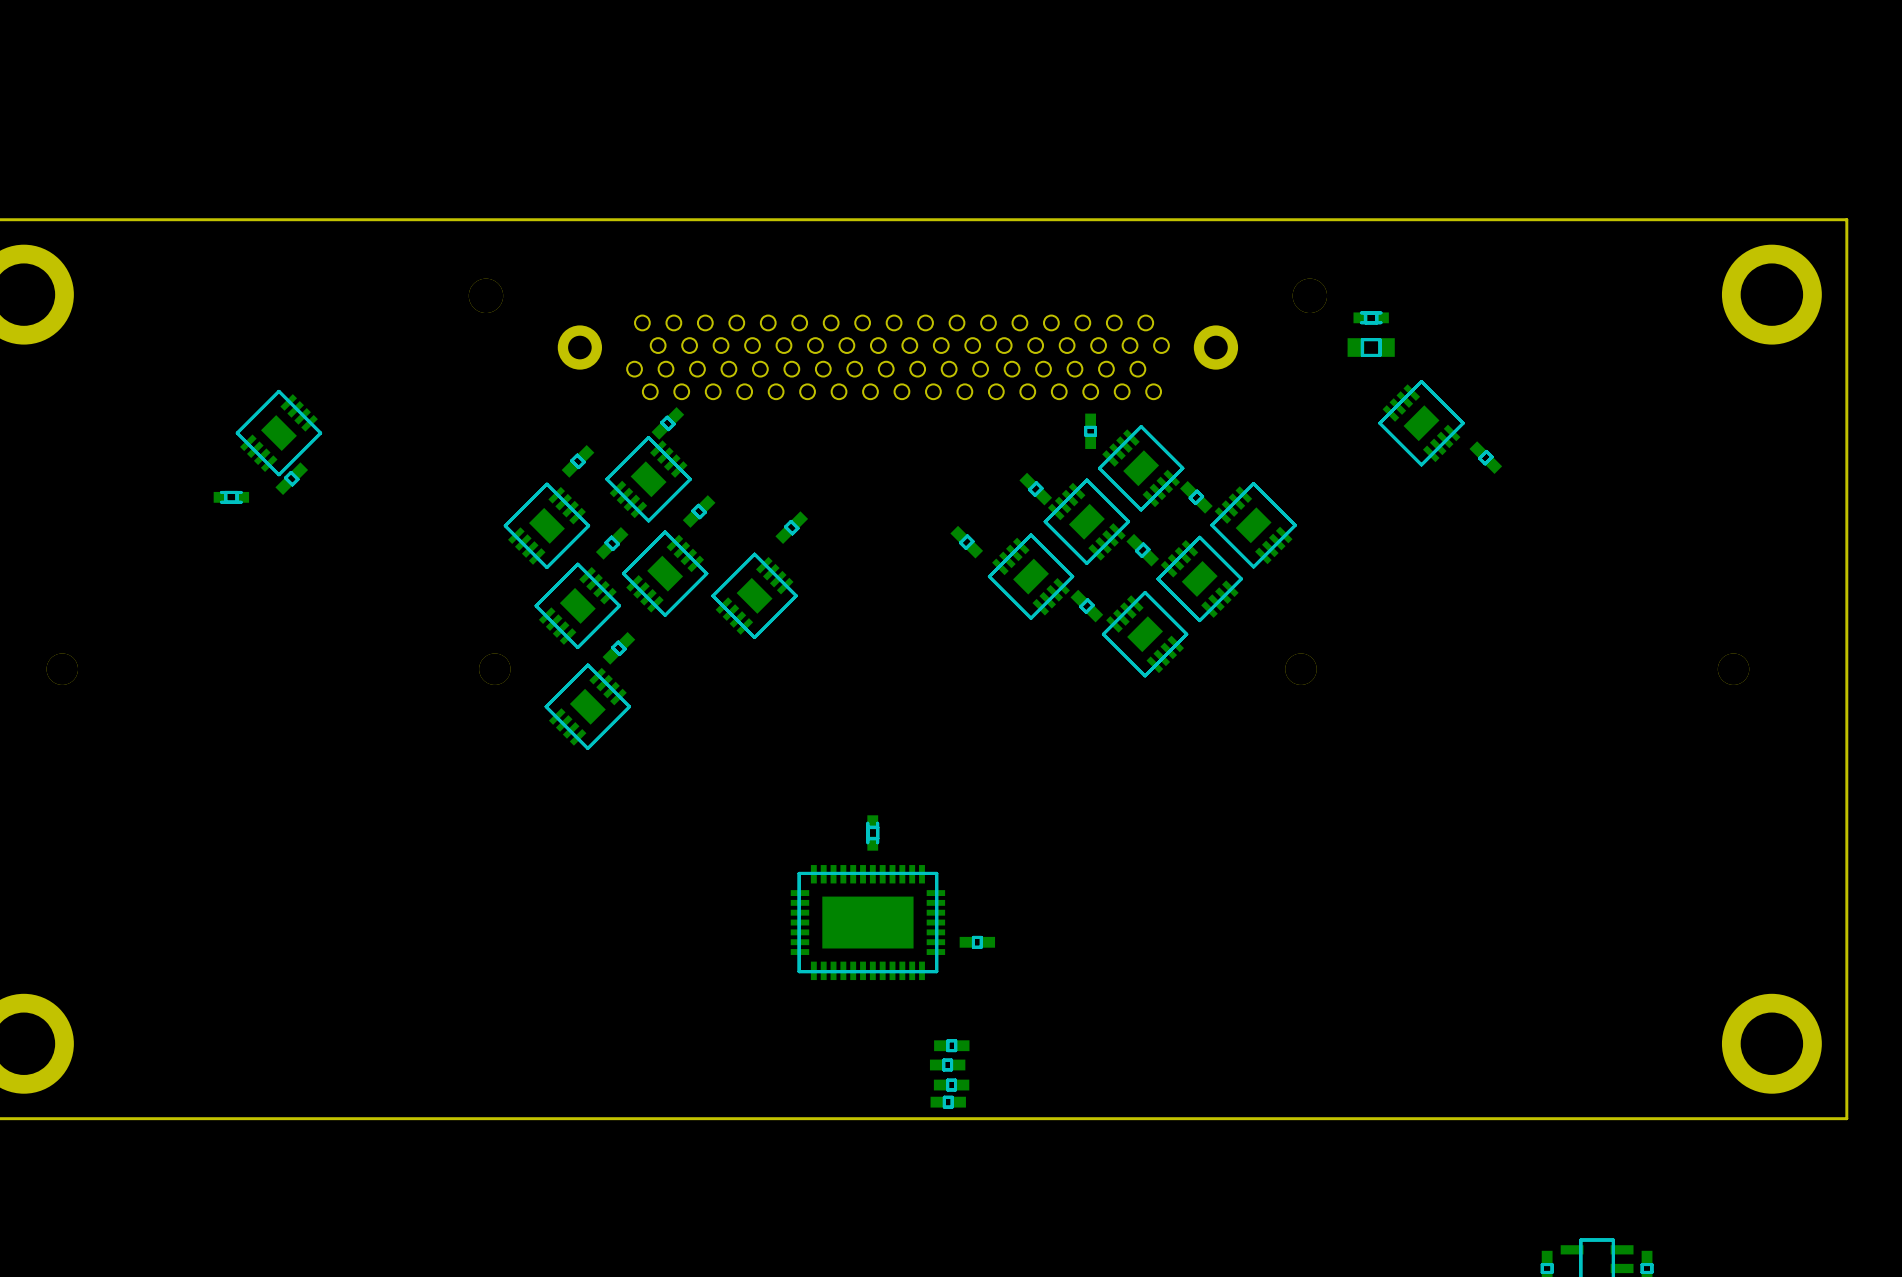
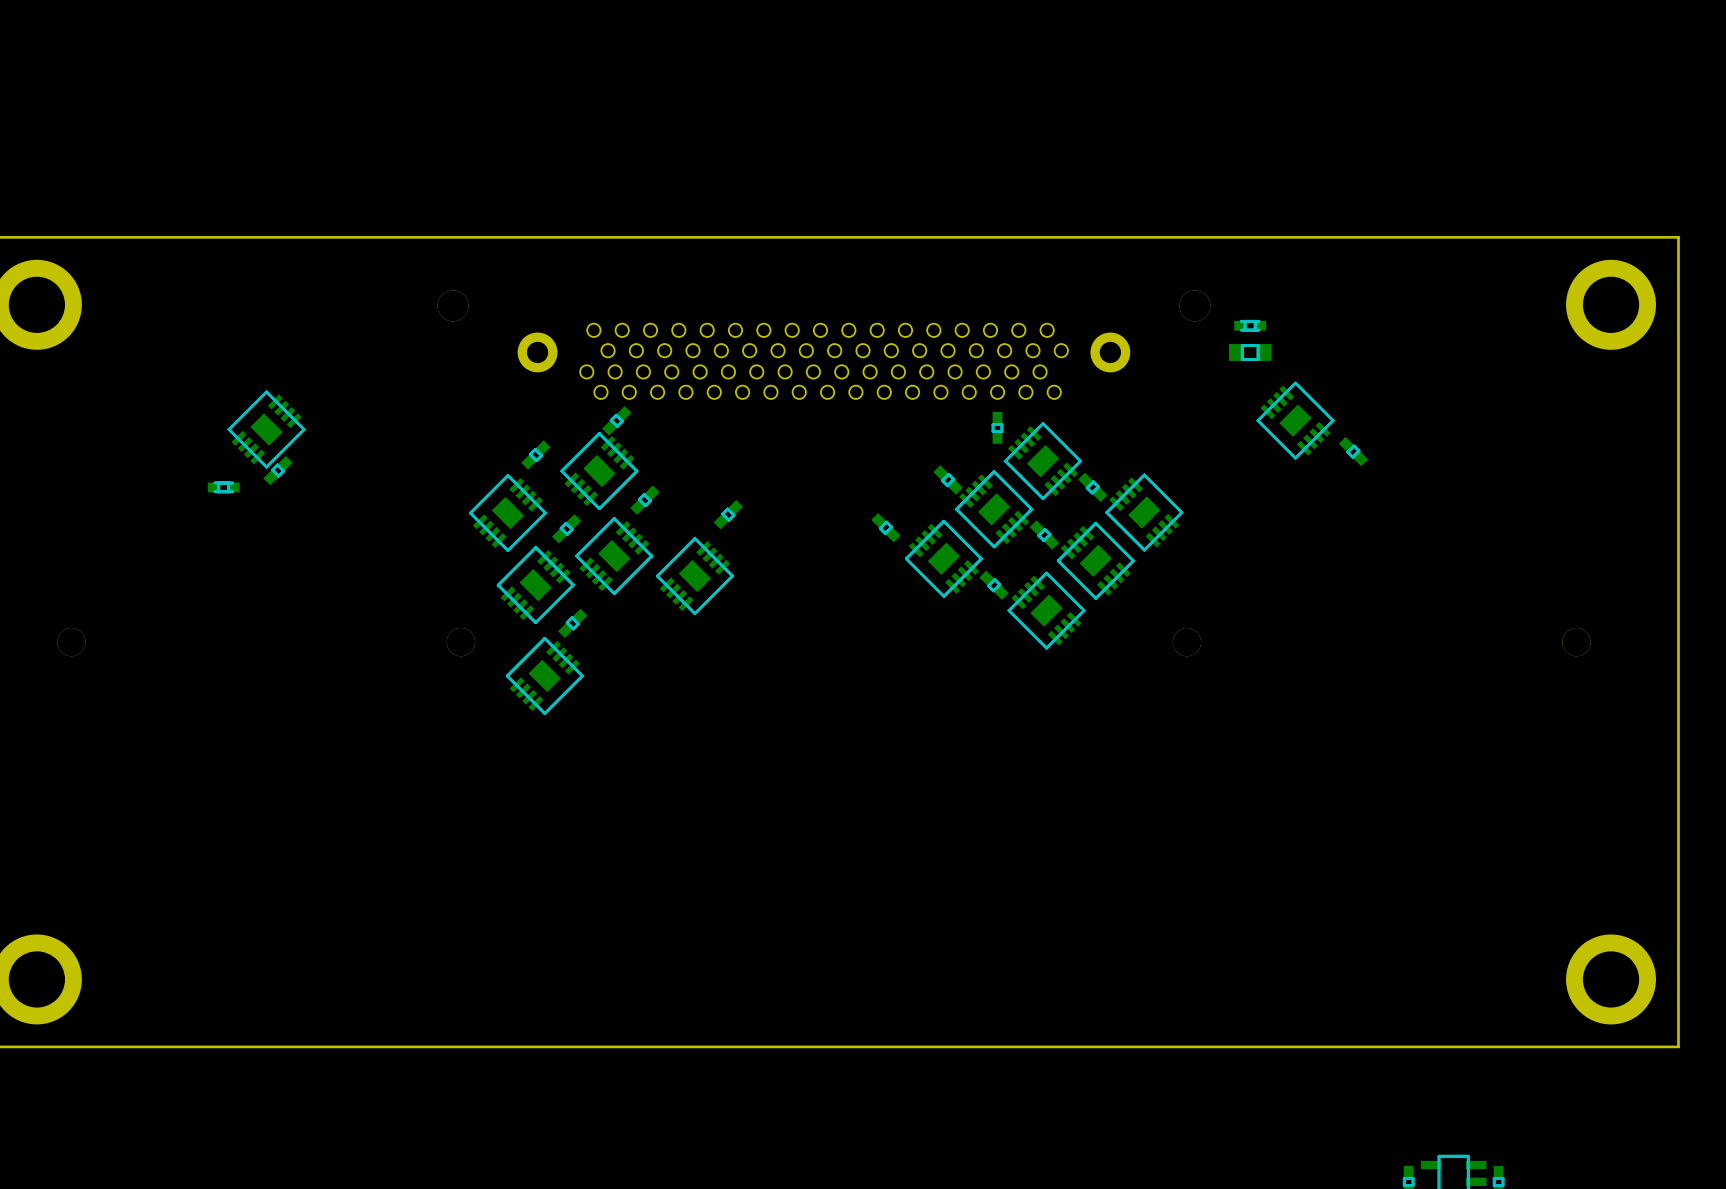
part: (872, 832) -> none
part: (867, 922) -> none
part: (977, 942) -> none
part: (951, 1045) -> none
part: (947, 1064) -> none
part: (951, 1085) -> none
part: (948, 1102) -> none

